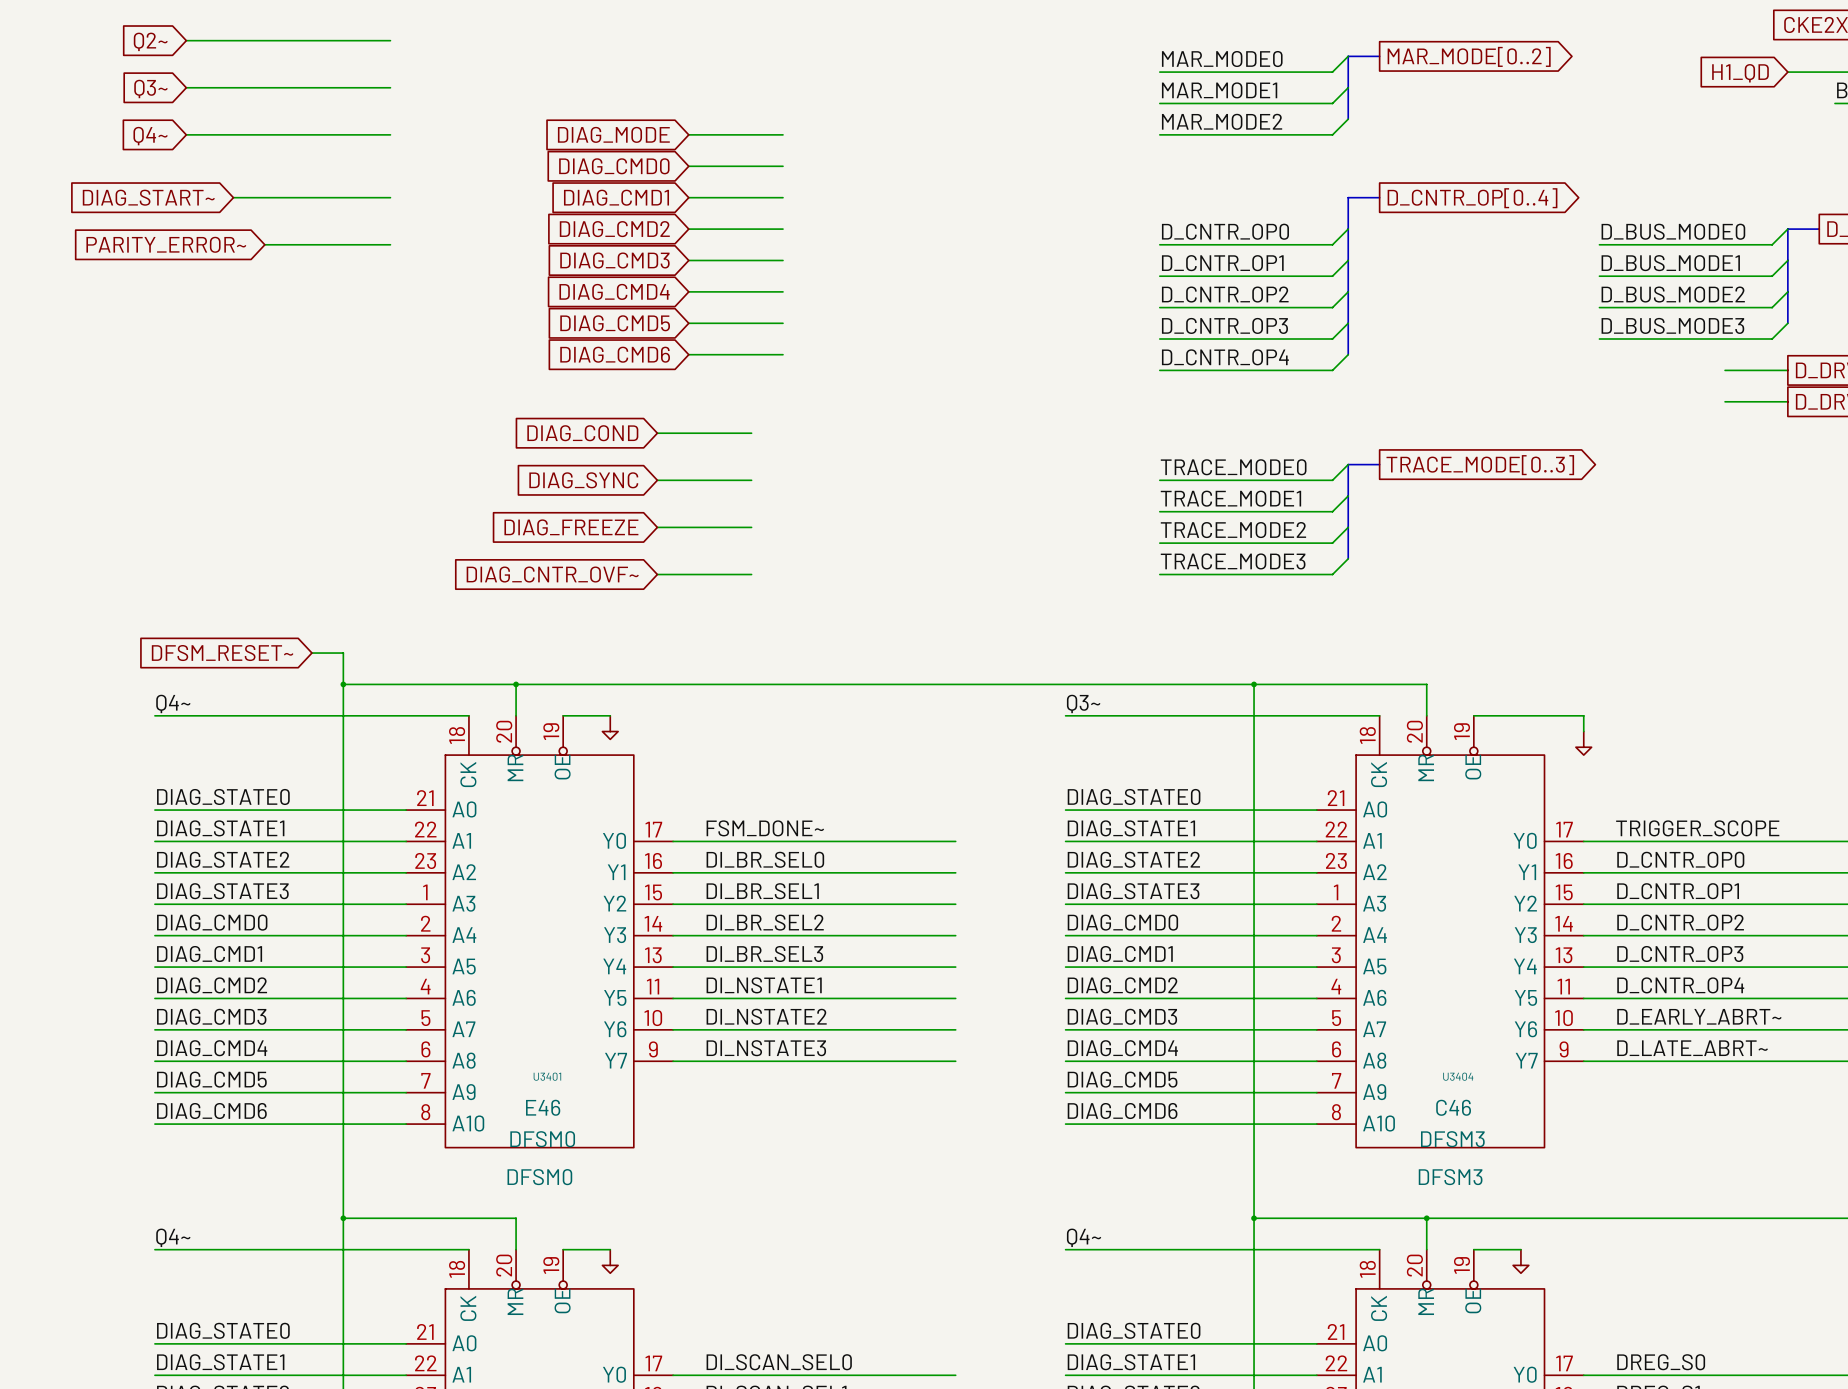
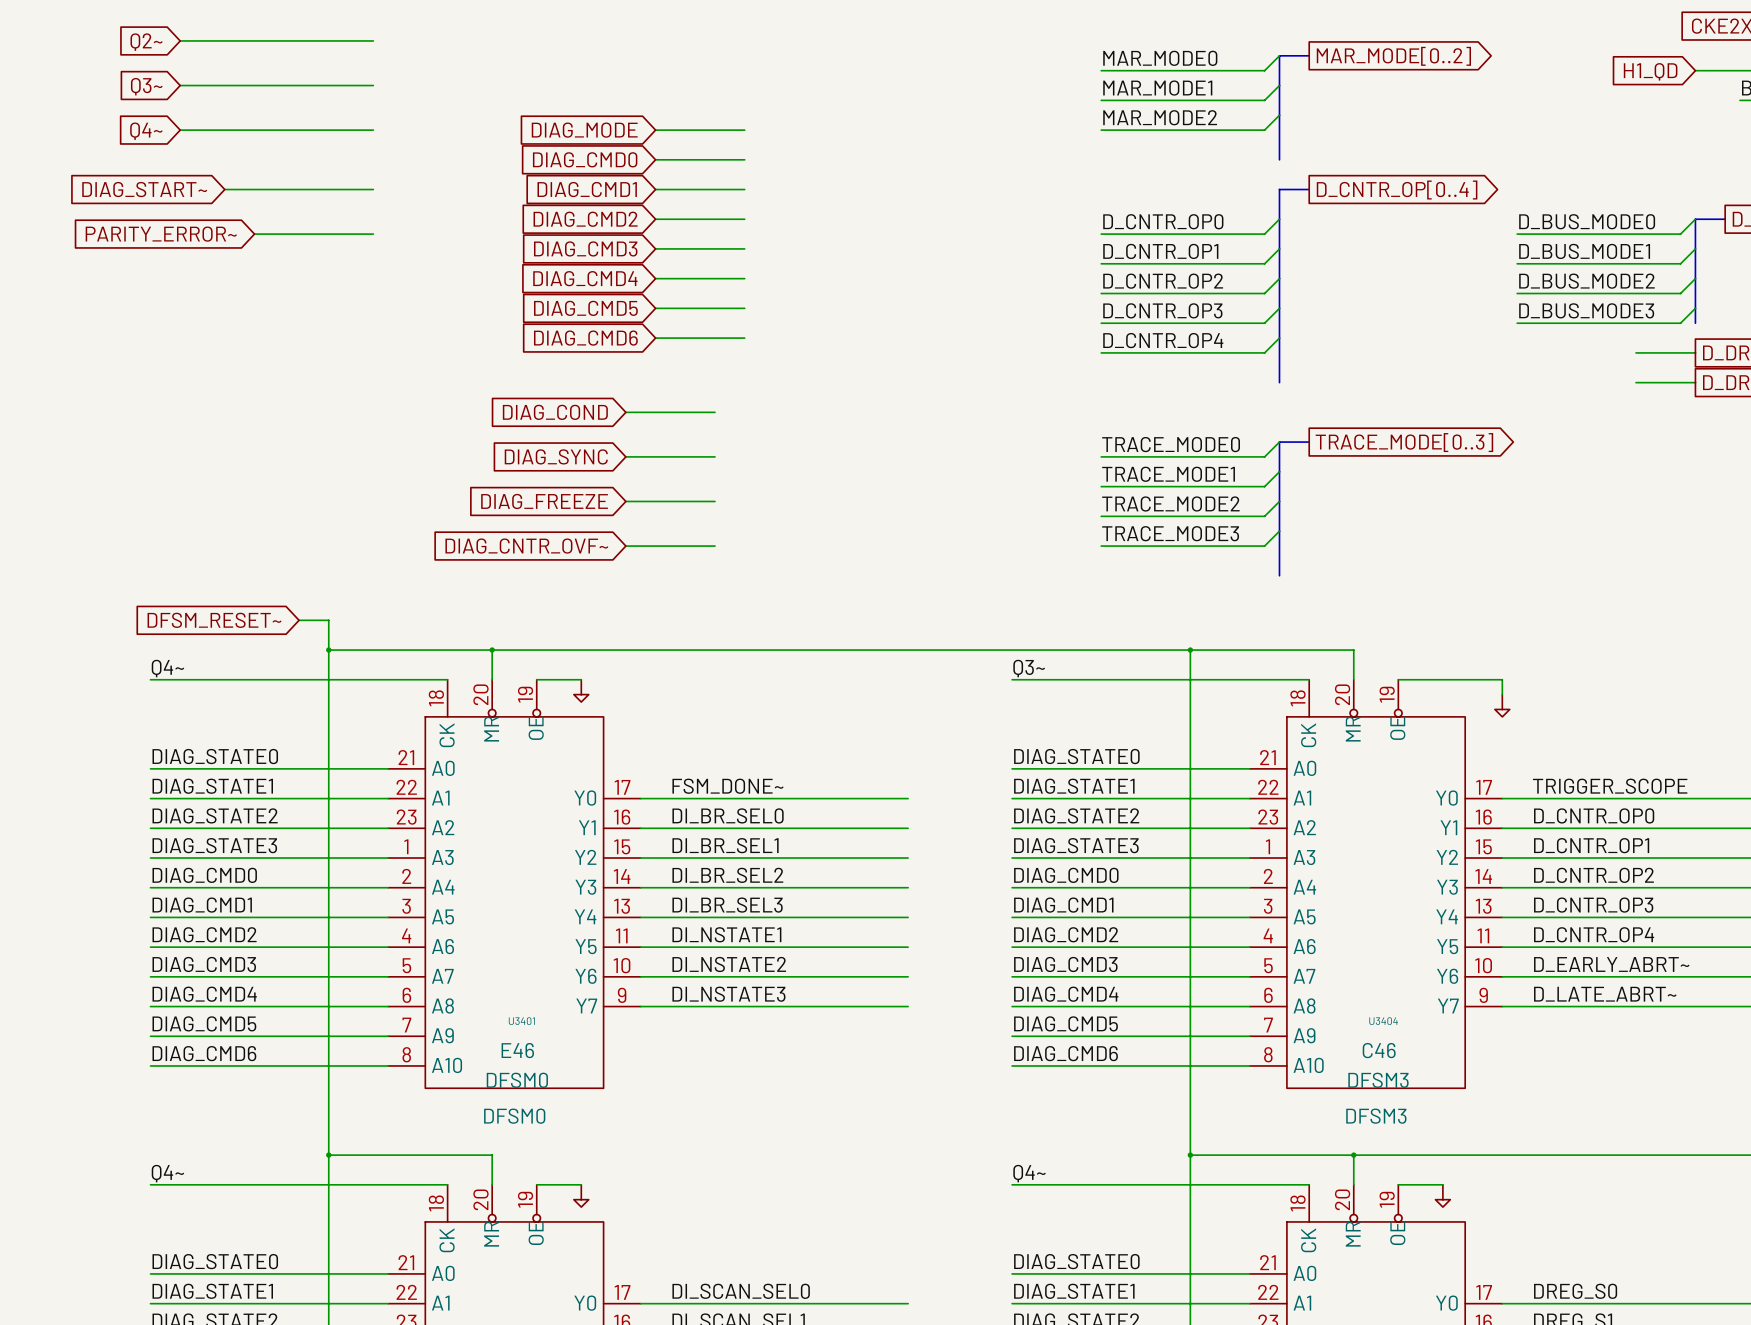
bus: none -> (1279, 115) (1279, 159)
bus: none -> (1695, 308) (1695, 323)
bus: none -> (1279, 338) (1279, 382)
bus: none -> (1279, 531) (1279, 575)

